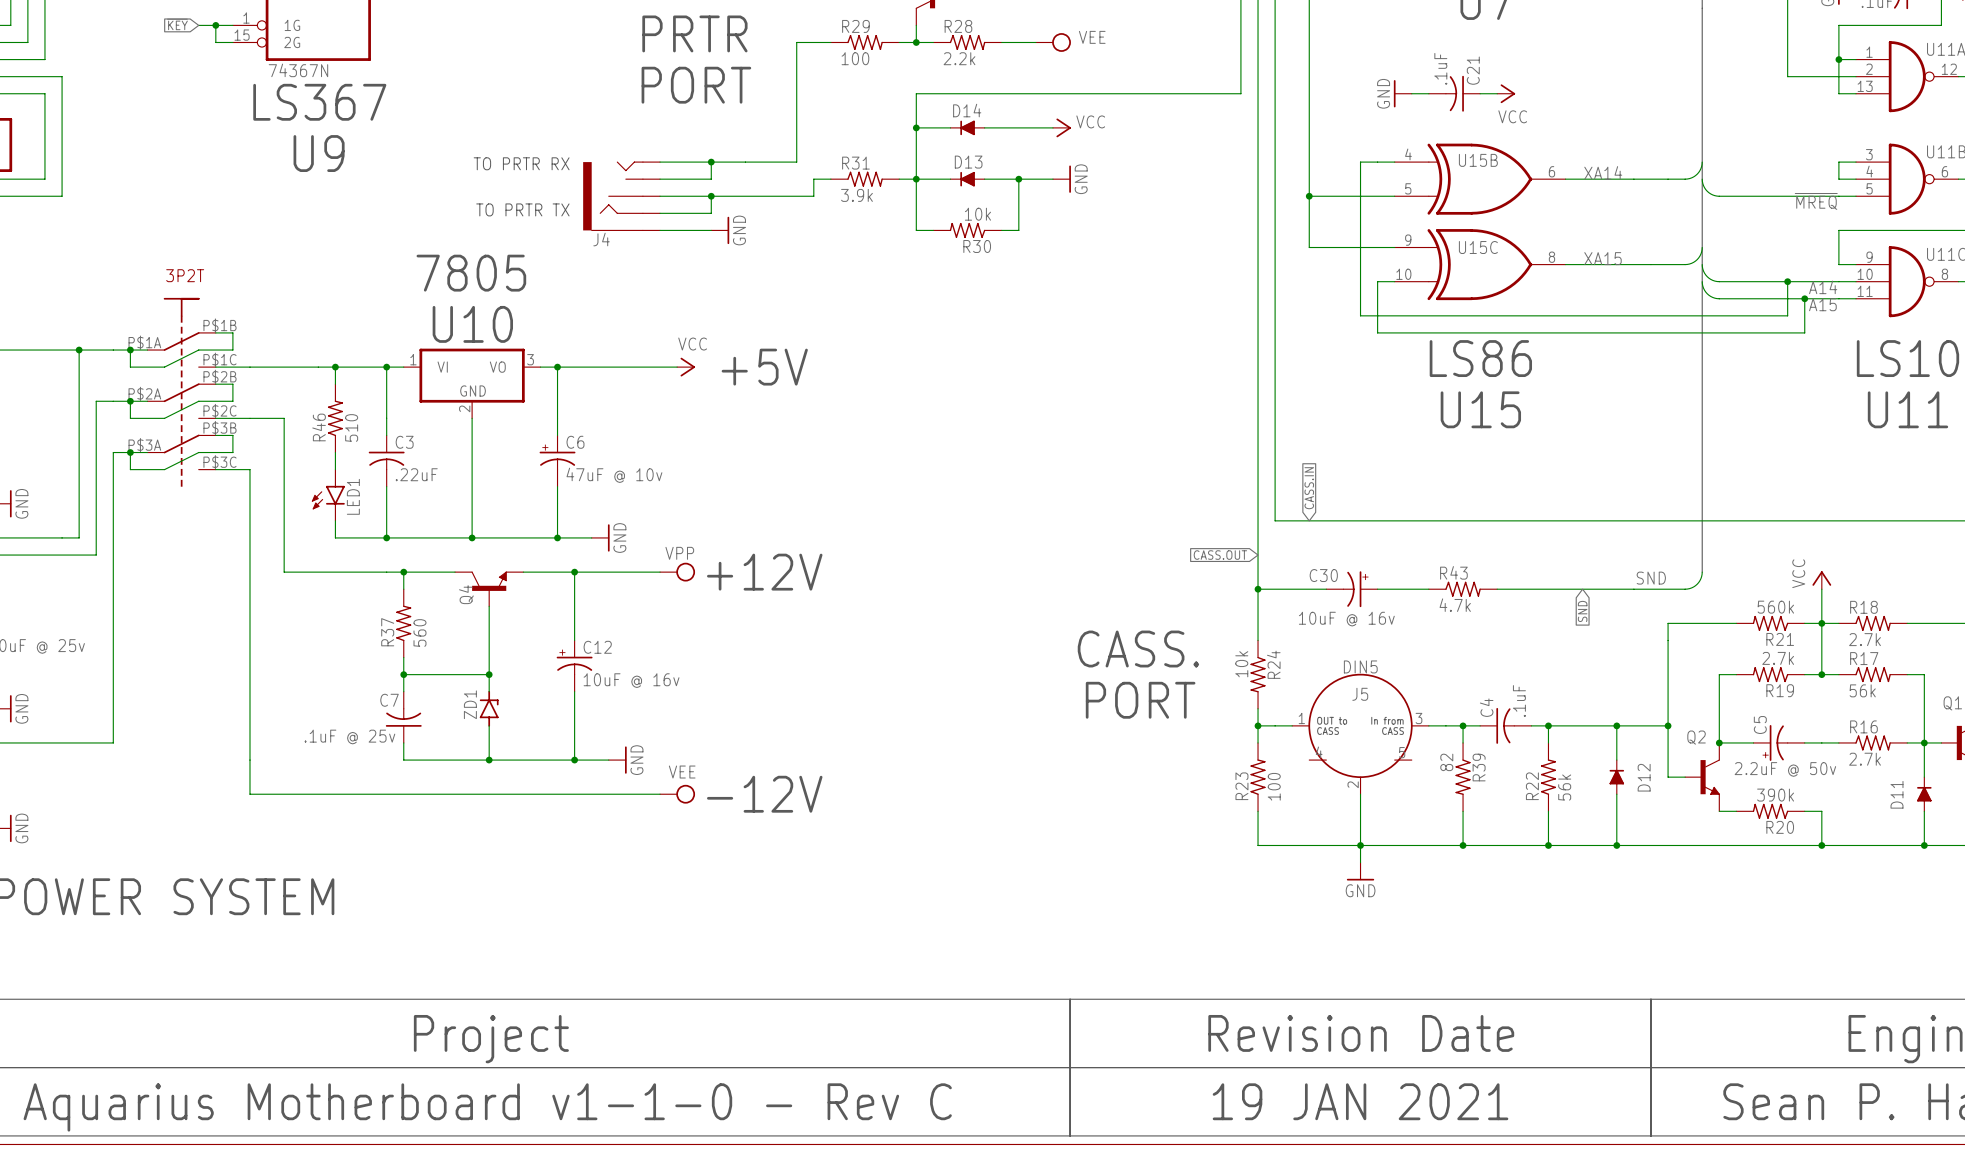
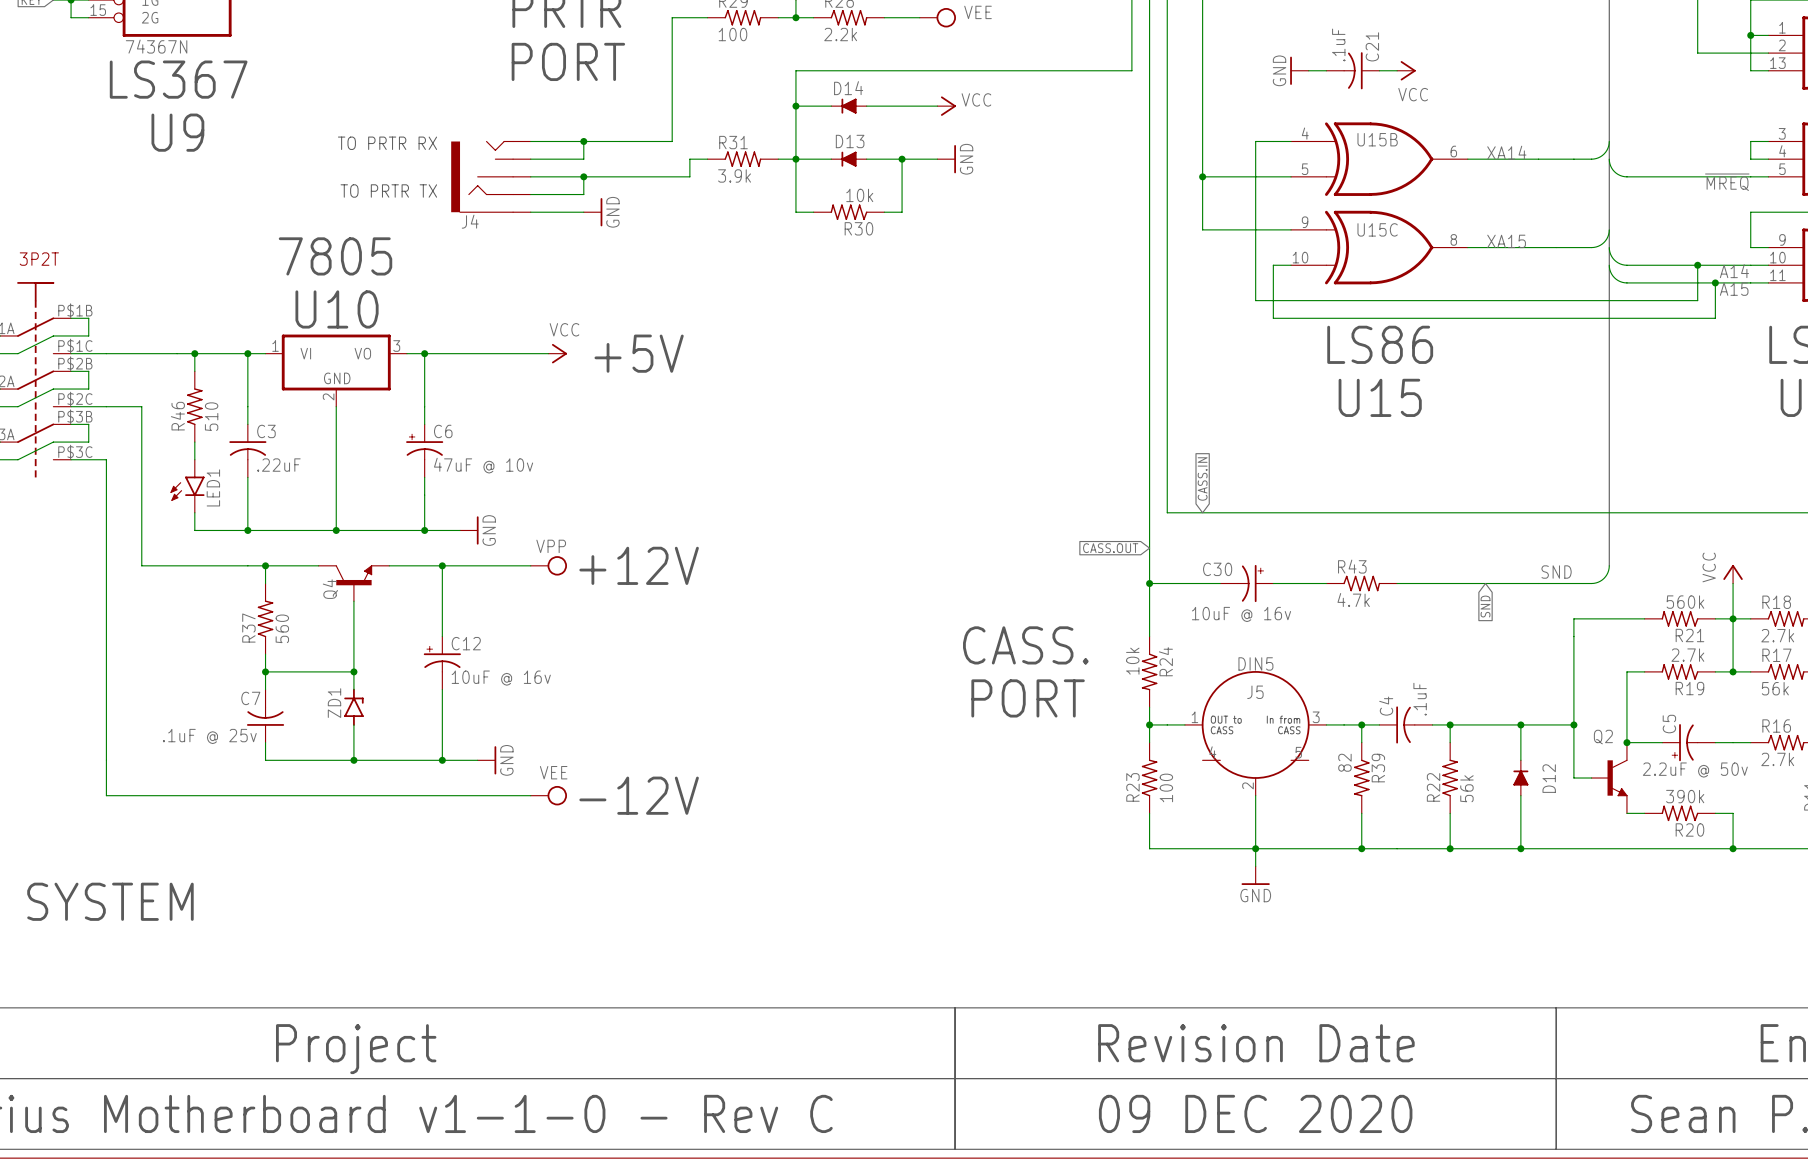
text: 19 JAN 2021 (1360, 1101) -> 09 DEC 2020 (1255, 1113)

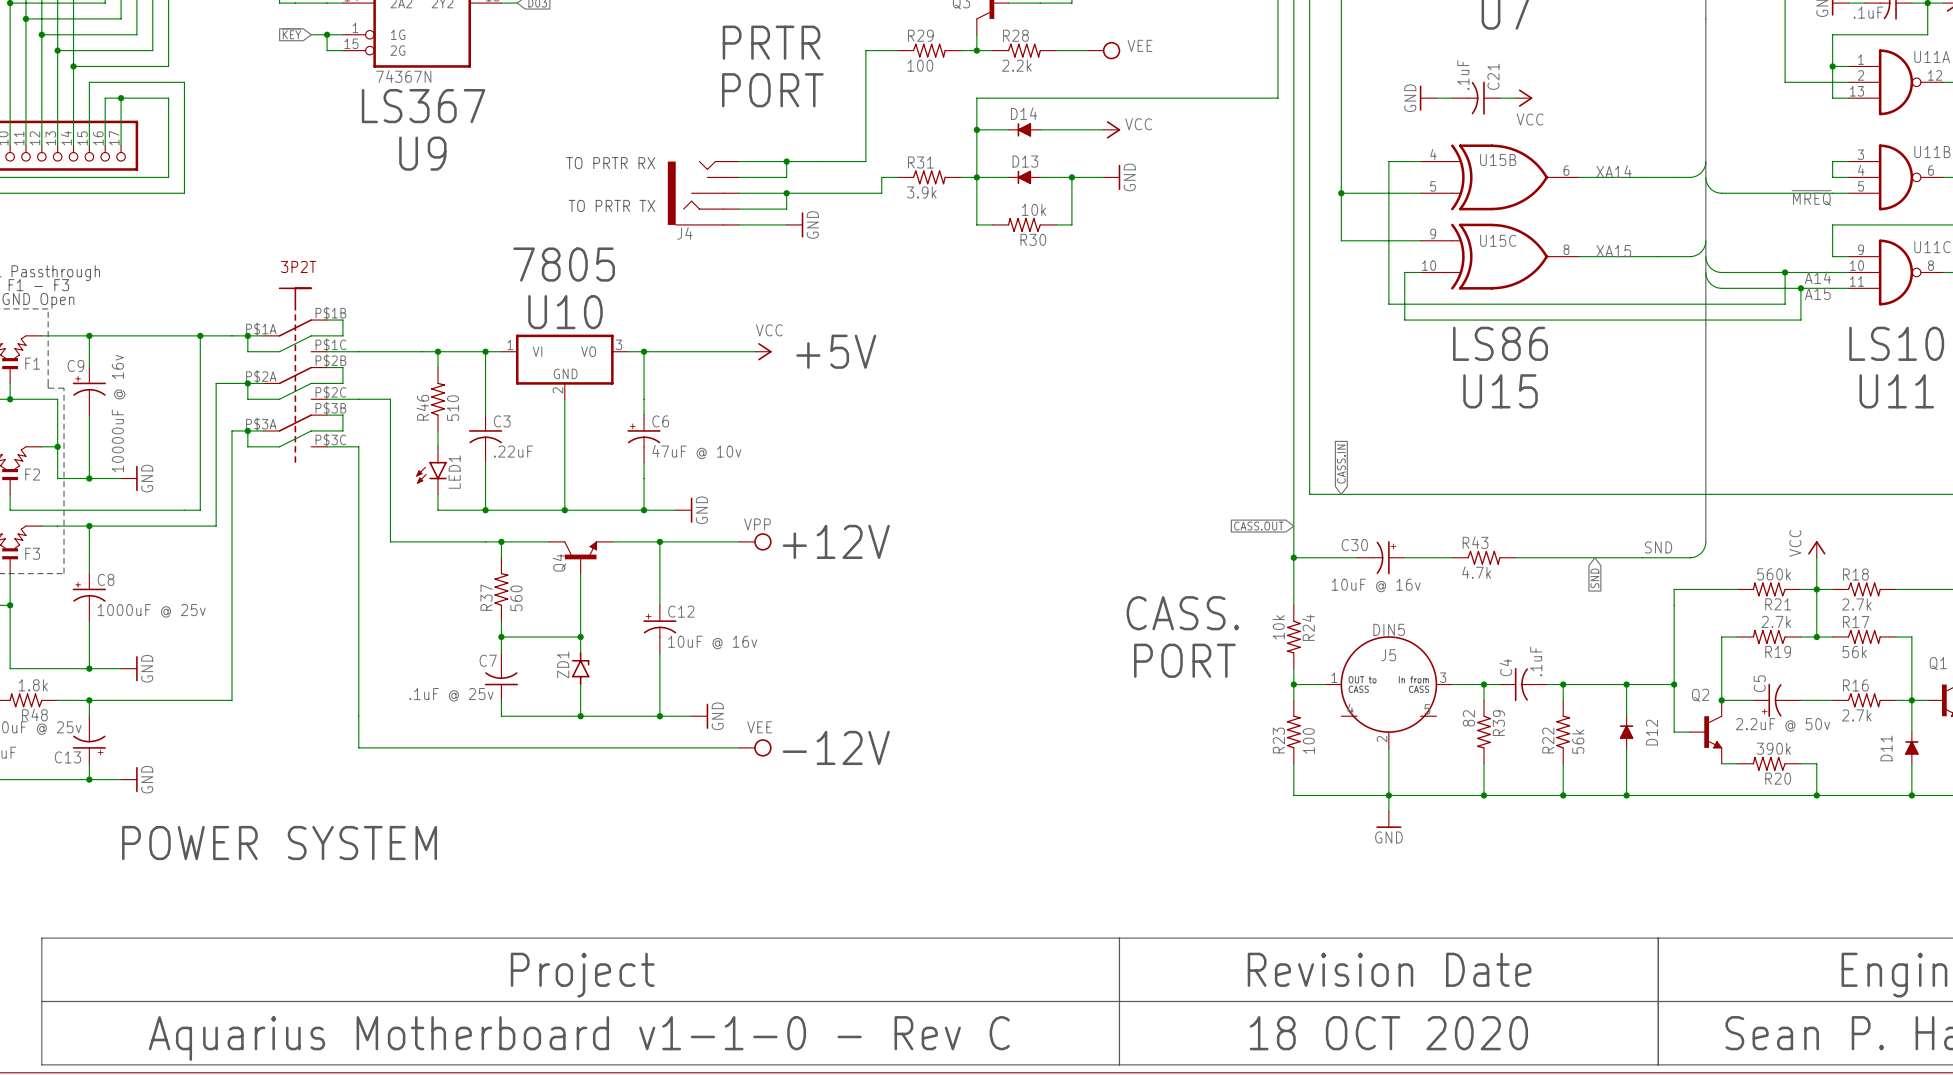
text: 09 DEC 2020 (1255, 1113) -> 18 OCT 2020 (1388, 1033)

